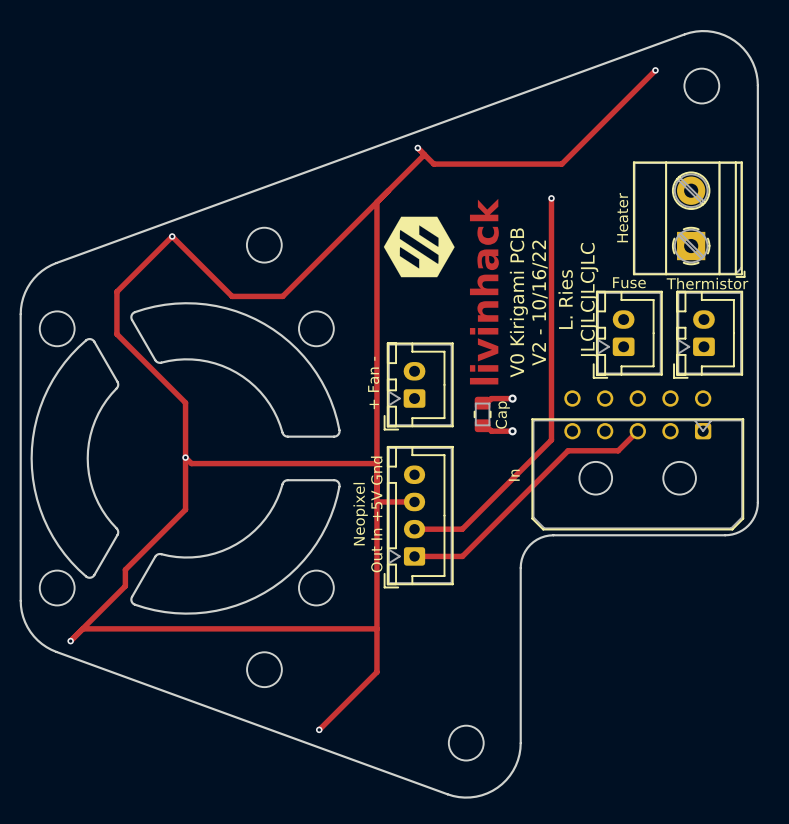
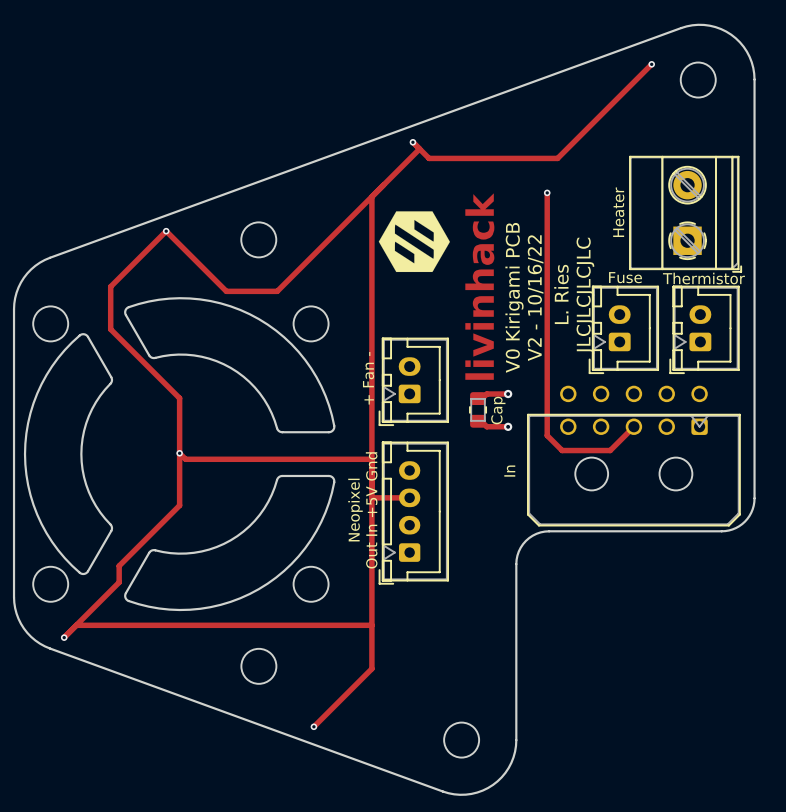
track: (637, 431) (618, 450) (568, 450) (462, 556) (414, 556) -> (633, 426) (610, 450) (562, 450) (547, 435)
track: (551, 440) (462, 529) (414, 529) -> none

